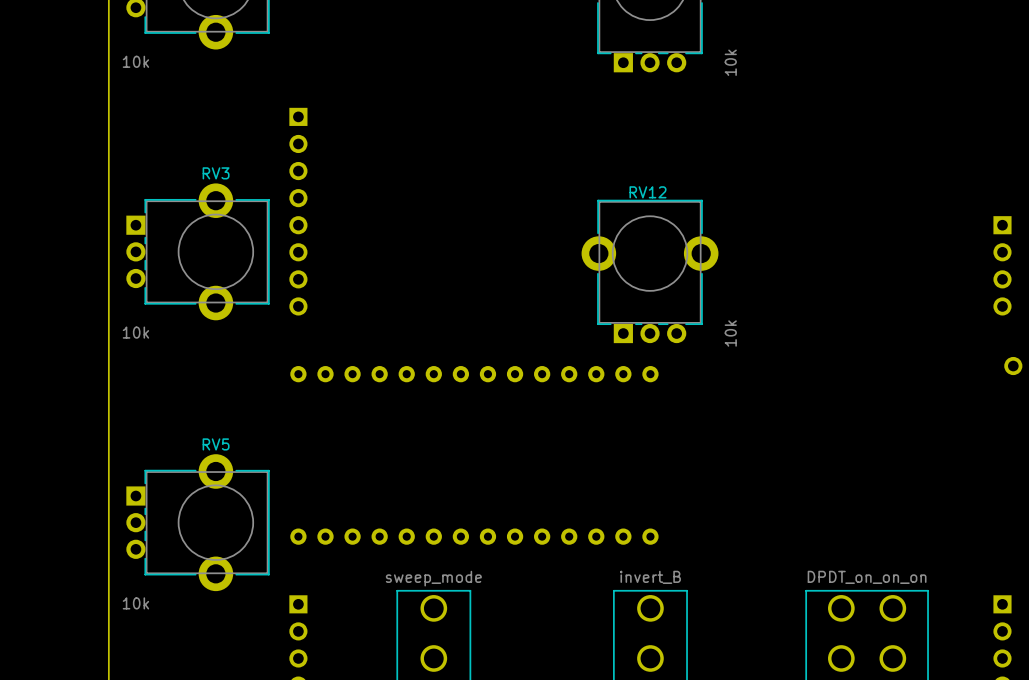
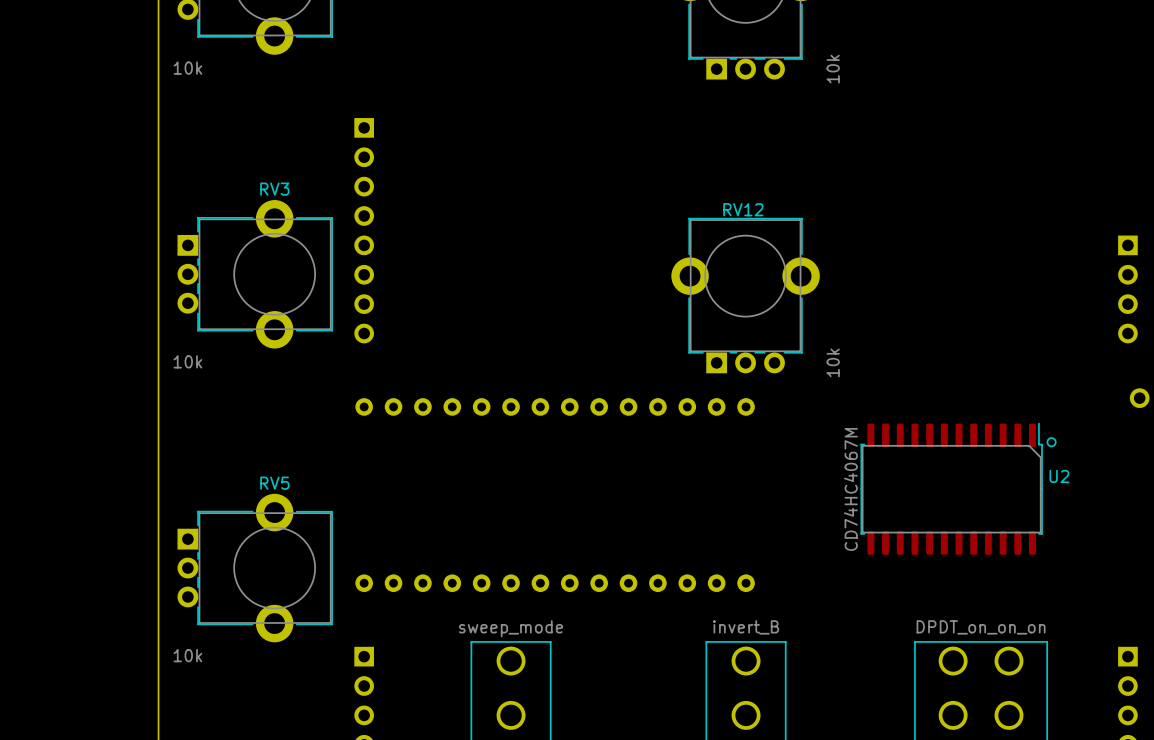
drawing: none -> [1046, 437, 1057, 448]
U2: none -> CD74HC4067M (951, 488)

